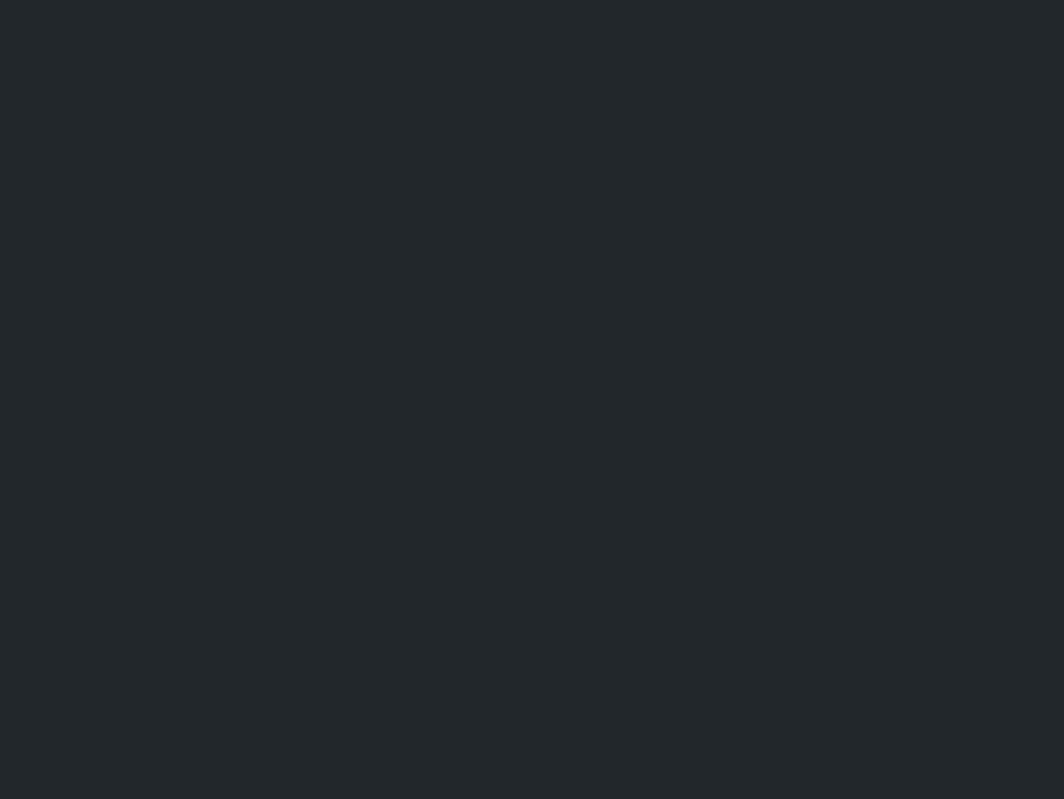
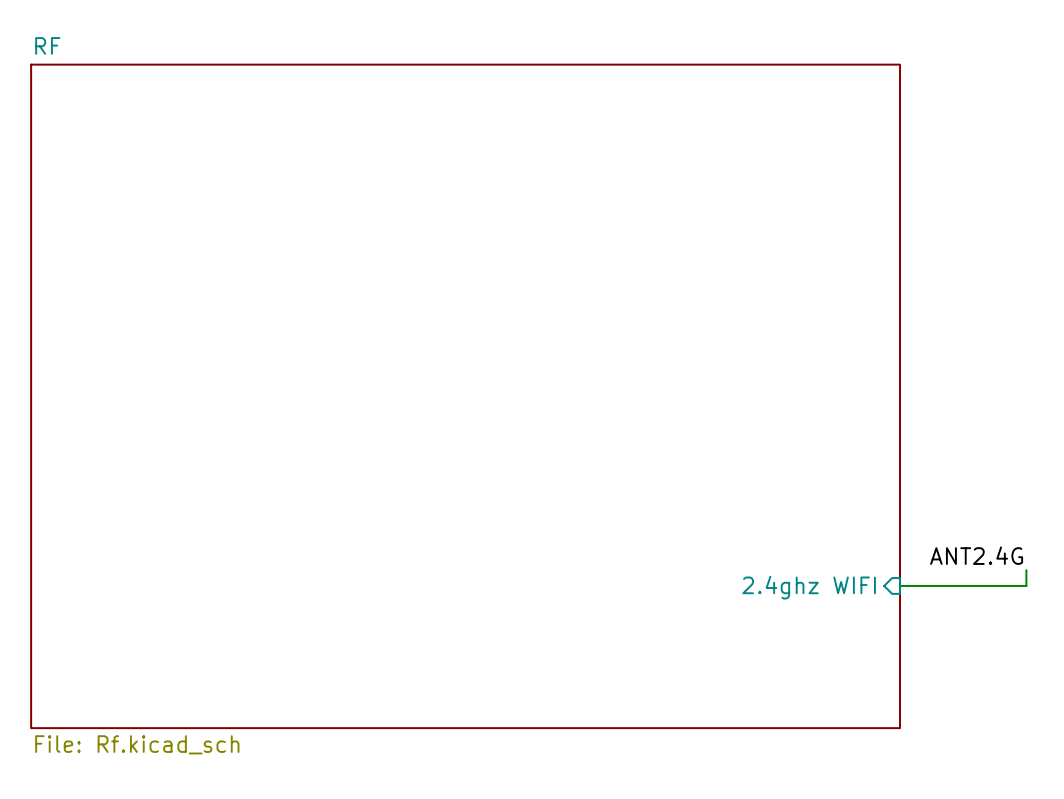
sheet RF: none -> File: Rf.kicad_sch (465, 396)
label: none -> ANT2.4G (976, 555)
wire: none -> (1026, 570) (1026, 585) (900, 585)
sheet pin: none -> 2.4ghz WIFI (809, 587)

